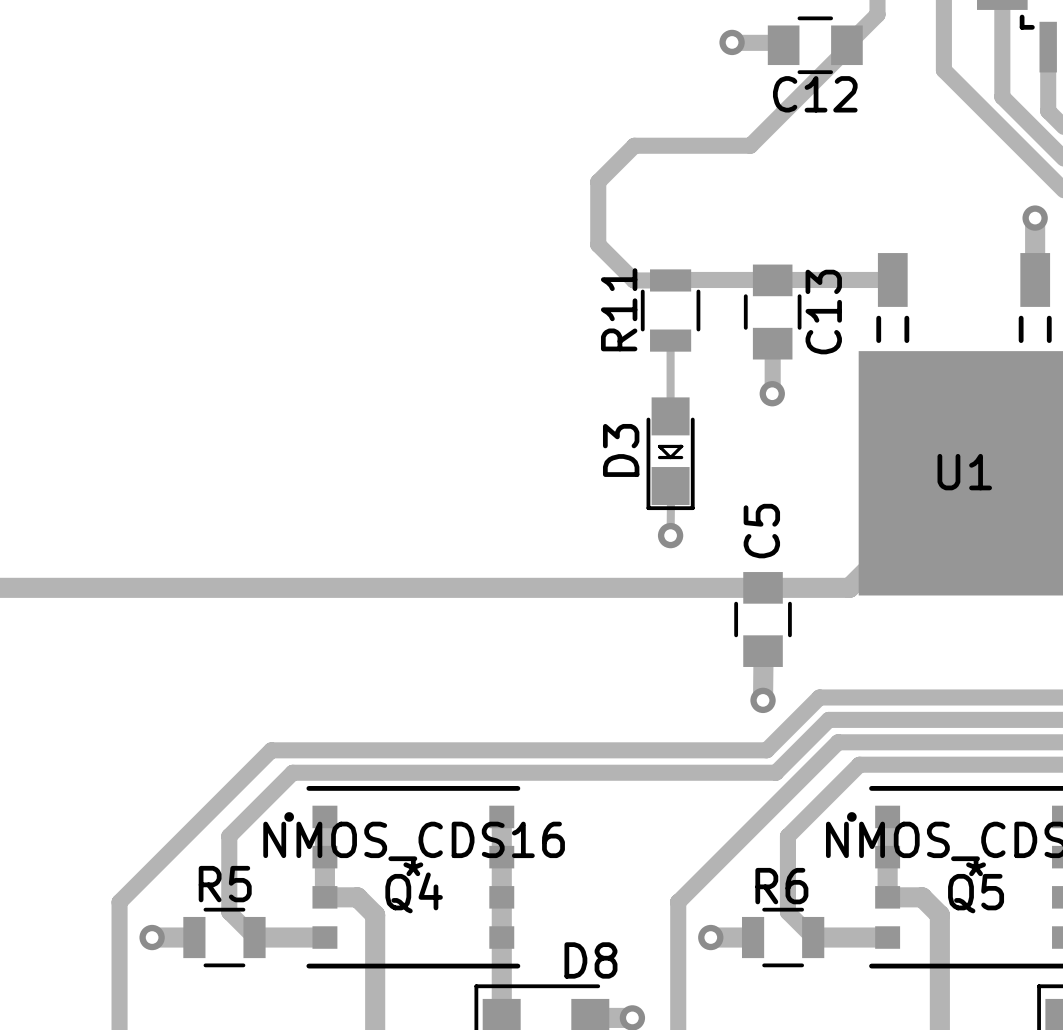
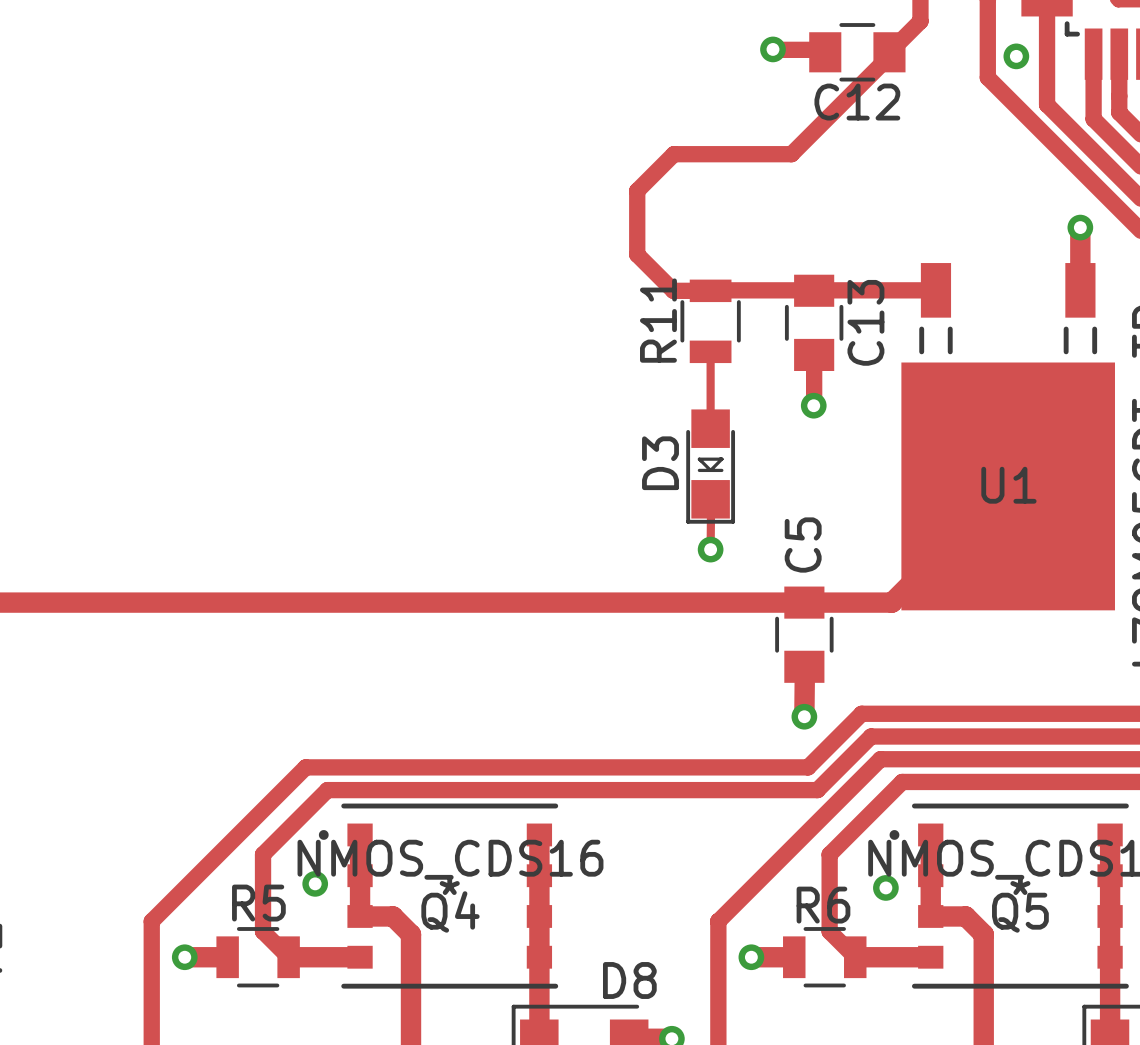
via: none -> (1016, 56)
via: none -> (315, 883)
via: none -> (885, 887)

